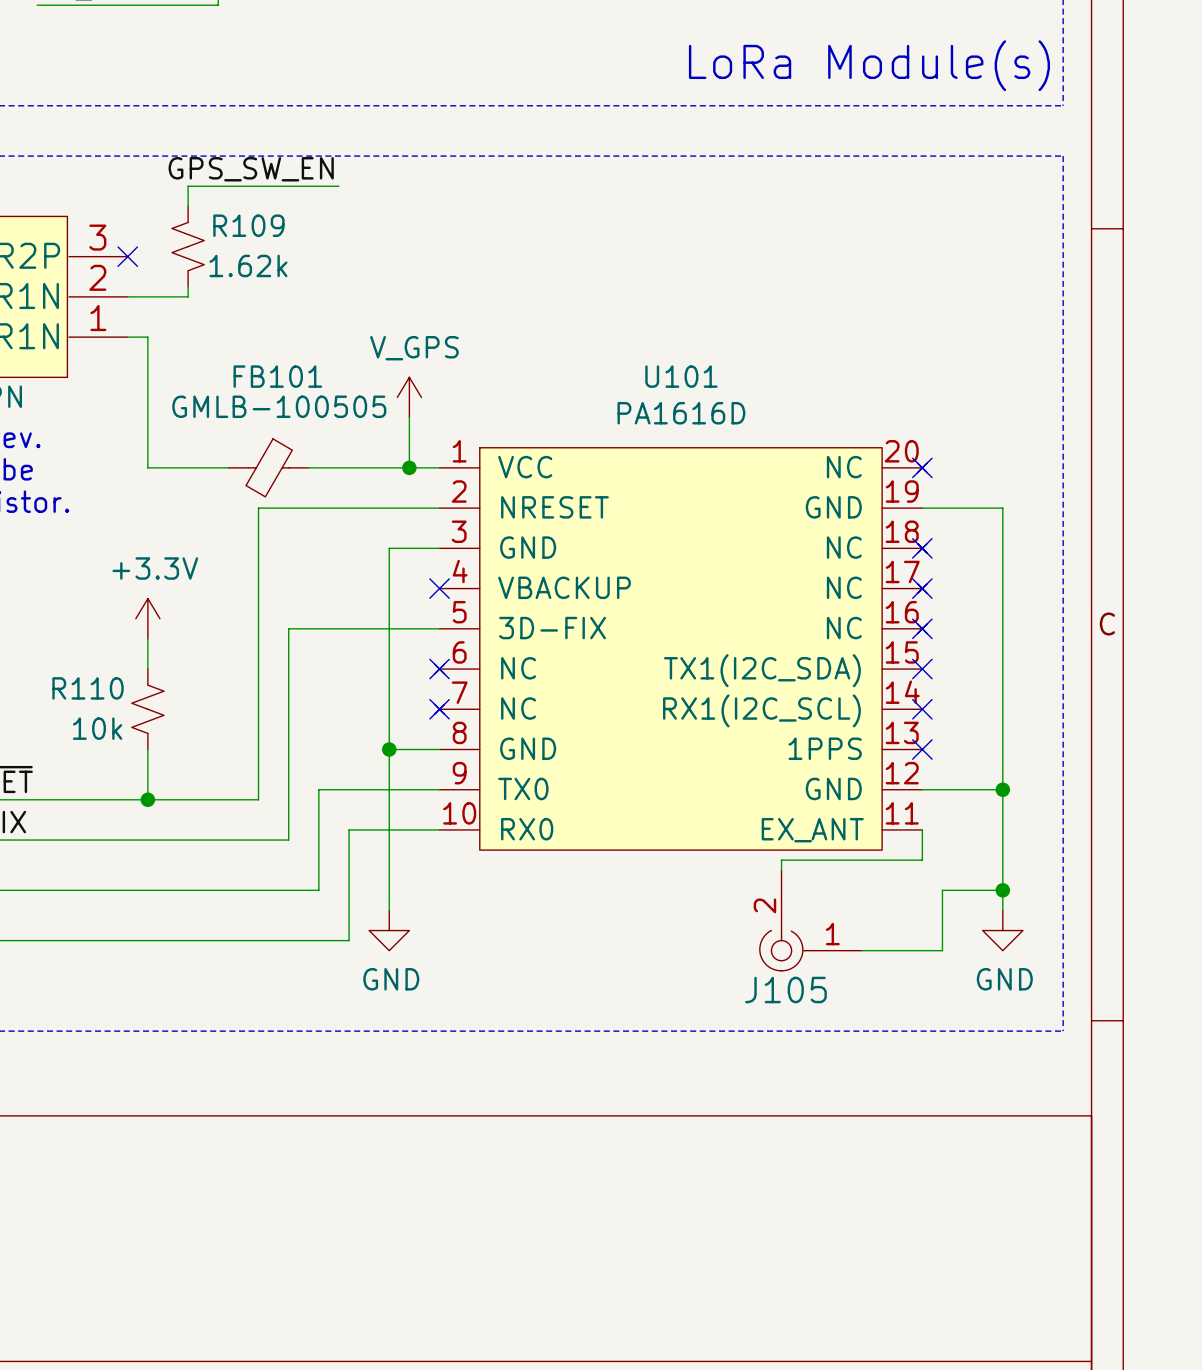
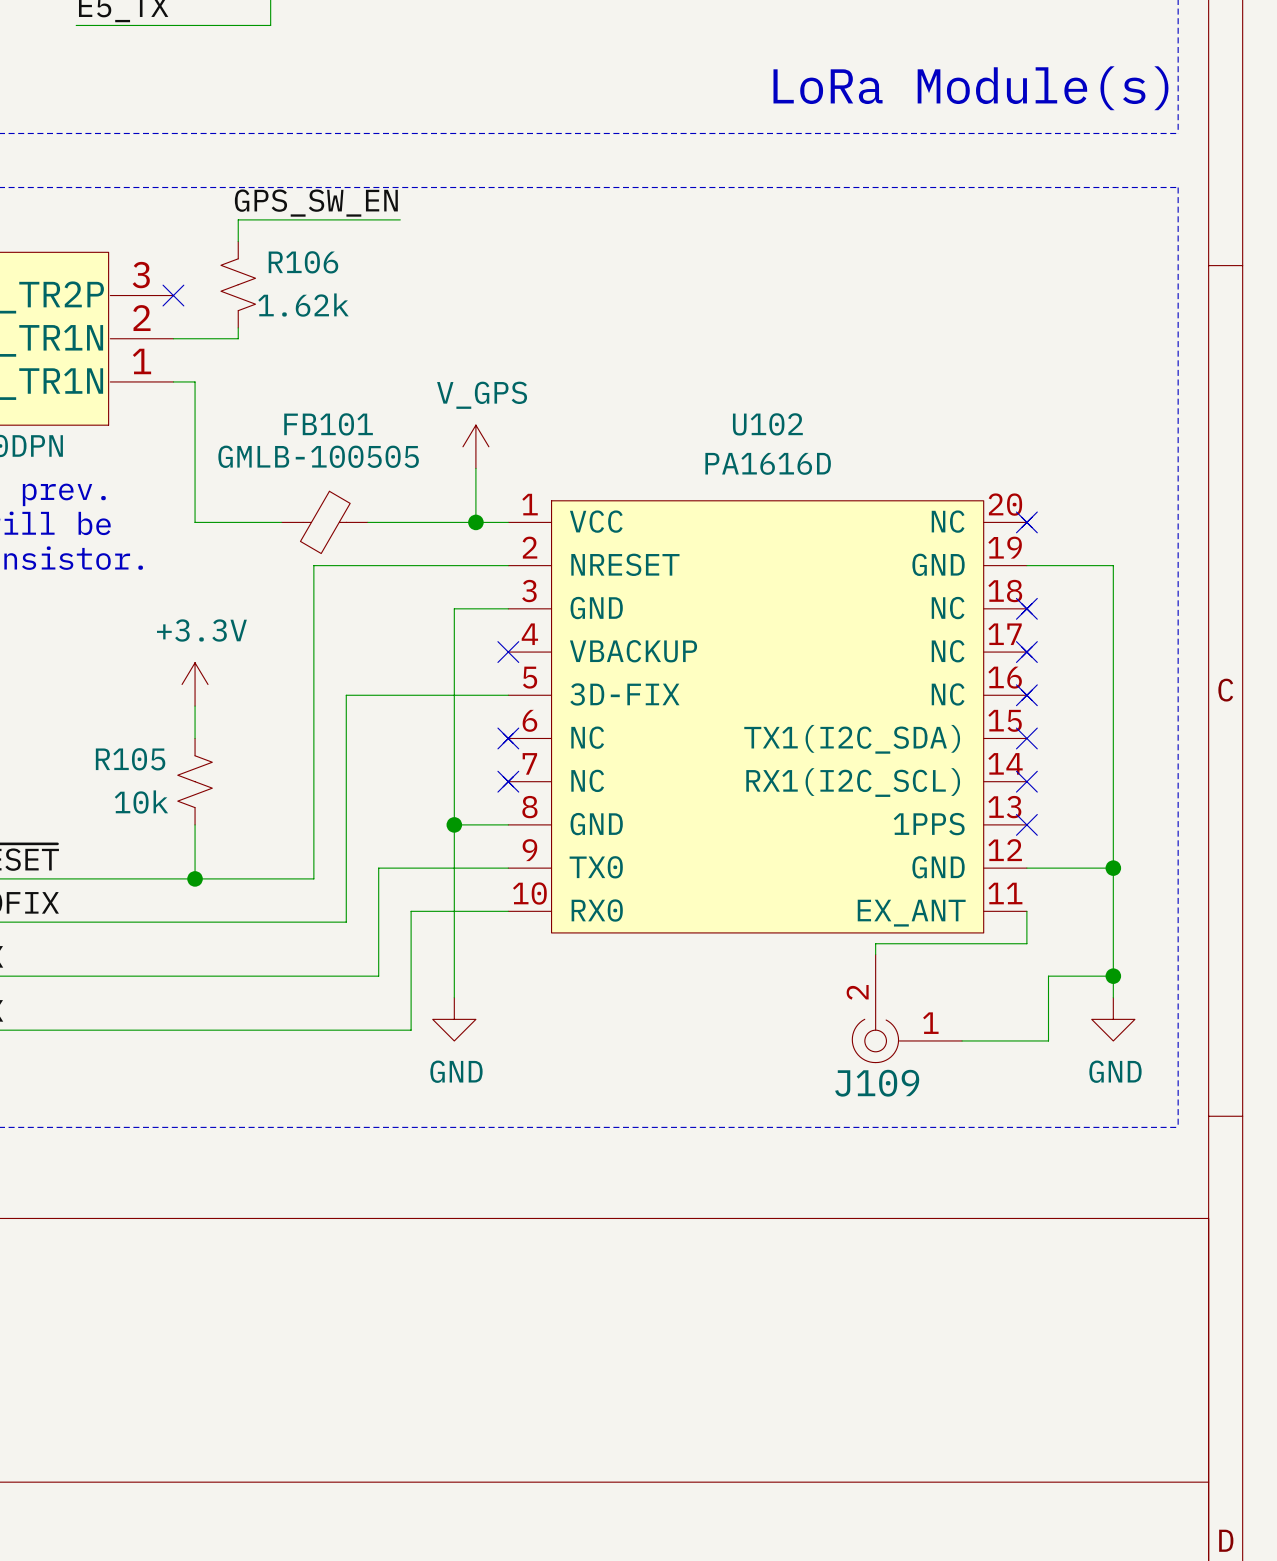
R109 name: R109 (248, 225) -> R106 (303, 262)
U101 name: U101 (681, 376) -> U102 (767, 424)
R110 name: R110 (88, 688) -> R105 (130, 759)
J105 name: J105 (786, 989) -> J109 (877, 1083)

